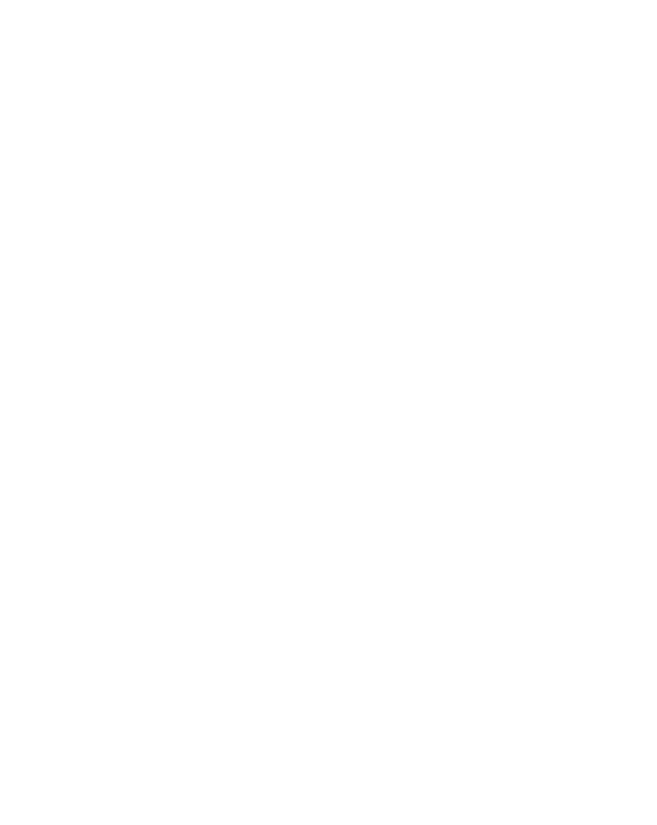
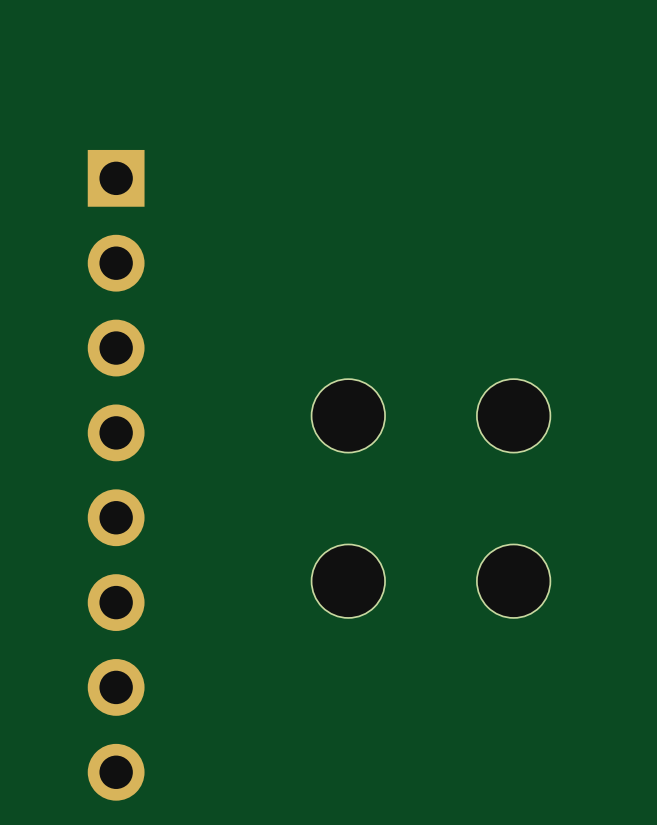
part: none -> (348, 415)
part: none -> (513, 415)
part: none -> (116, 475)
part: none -> (348, 581)
part: none -> (513, 581)

